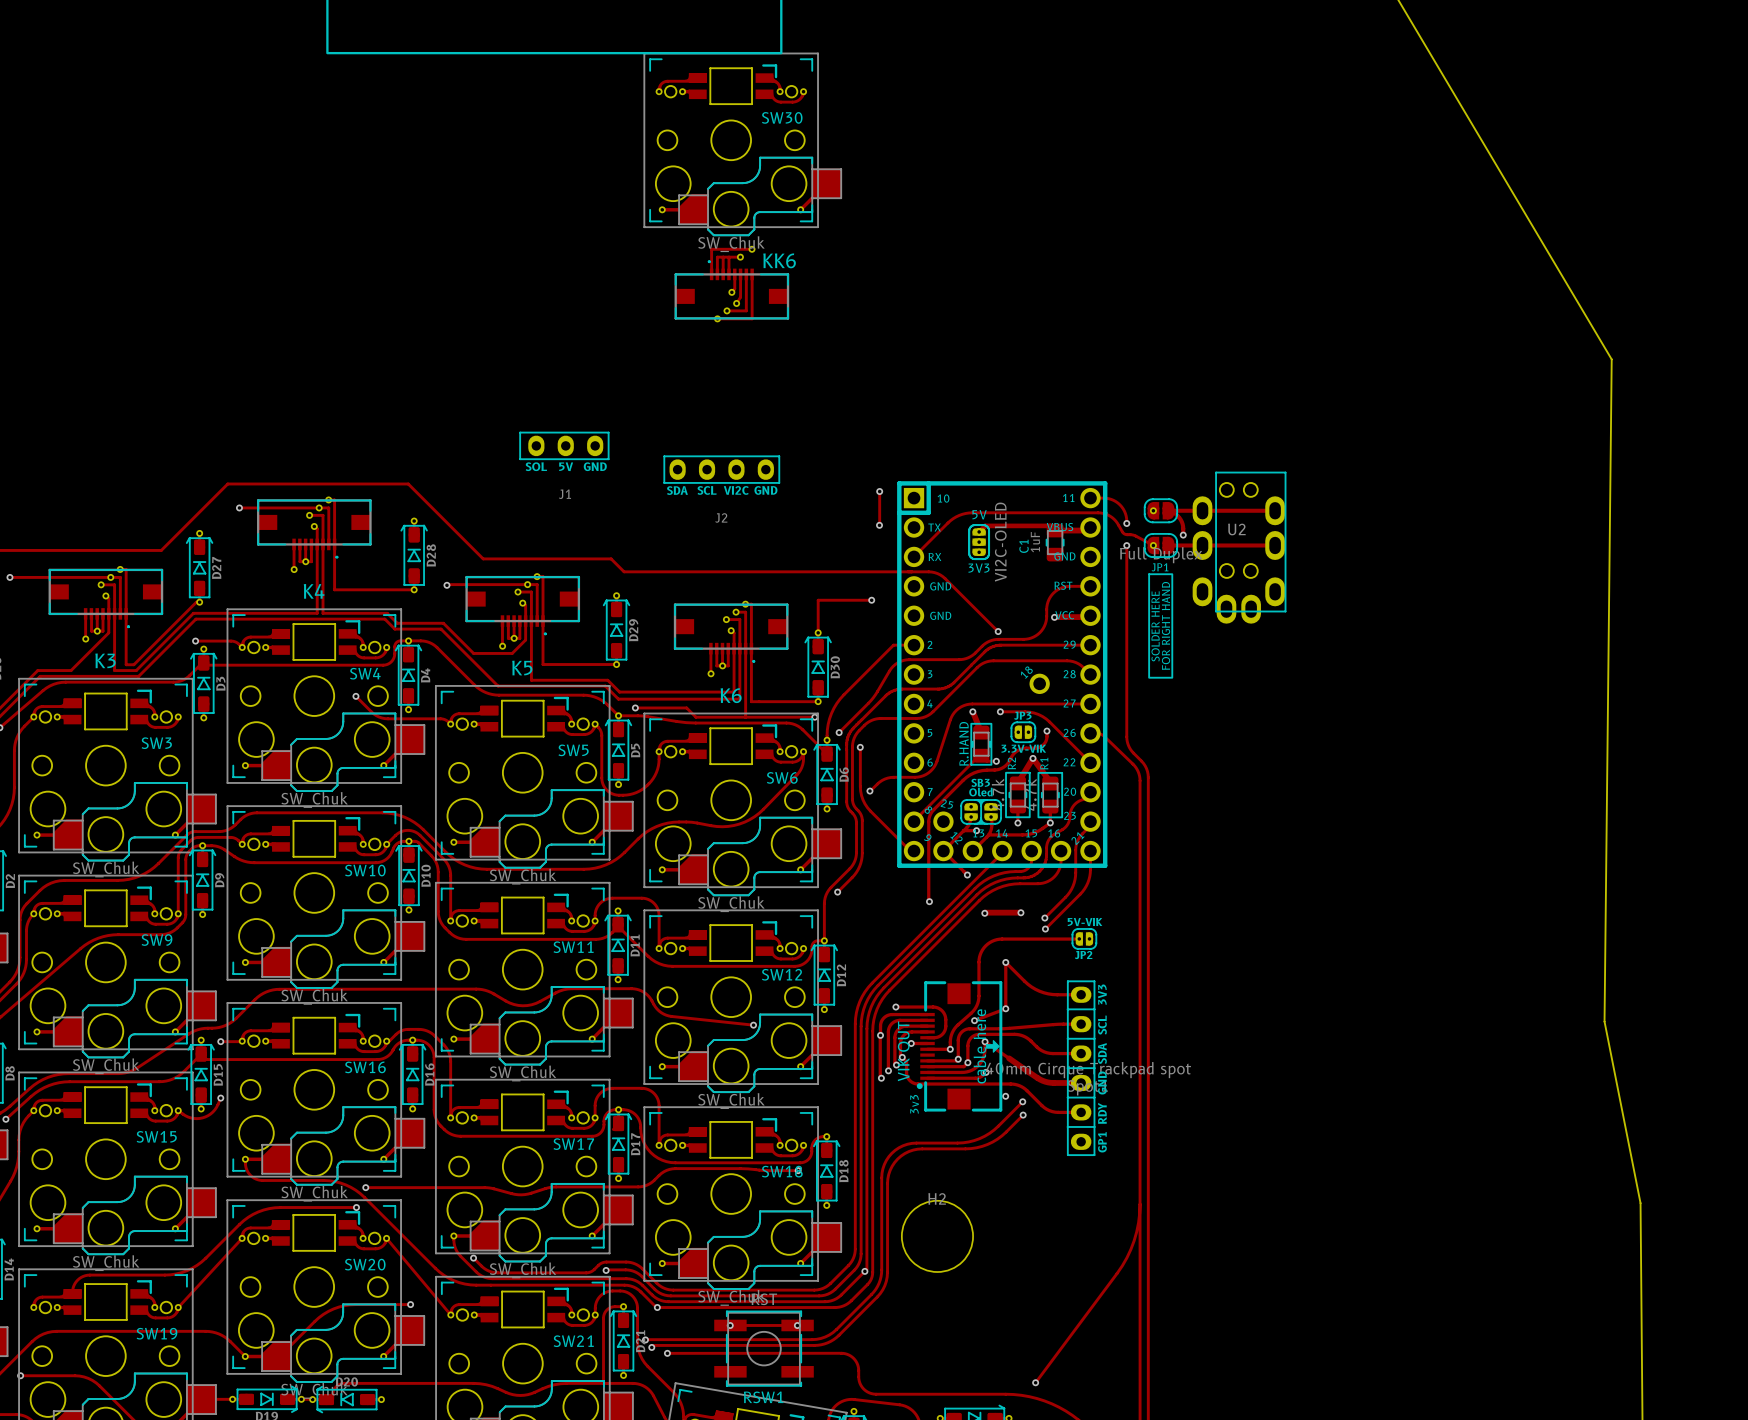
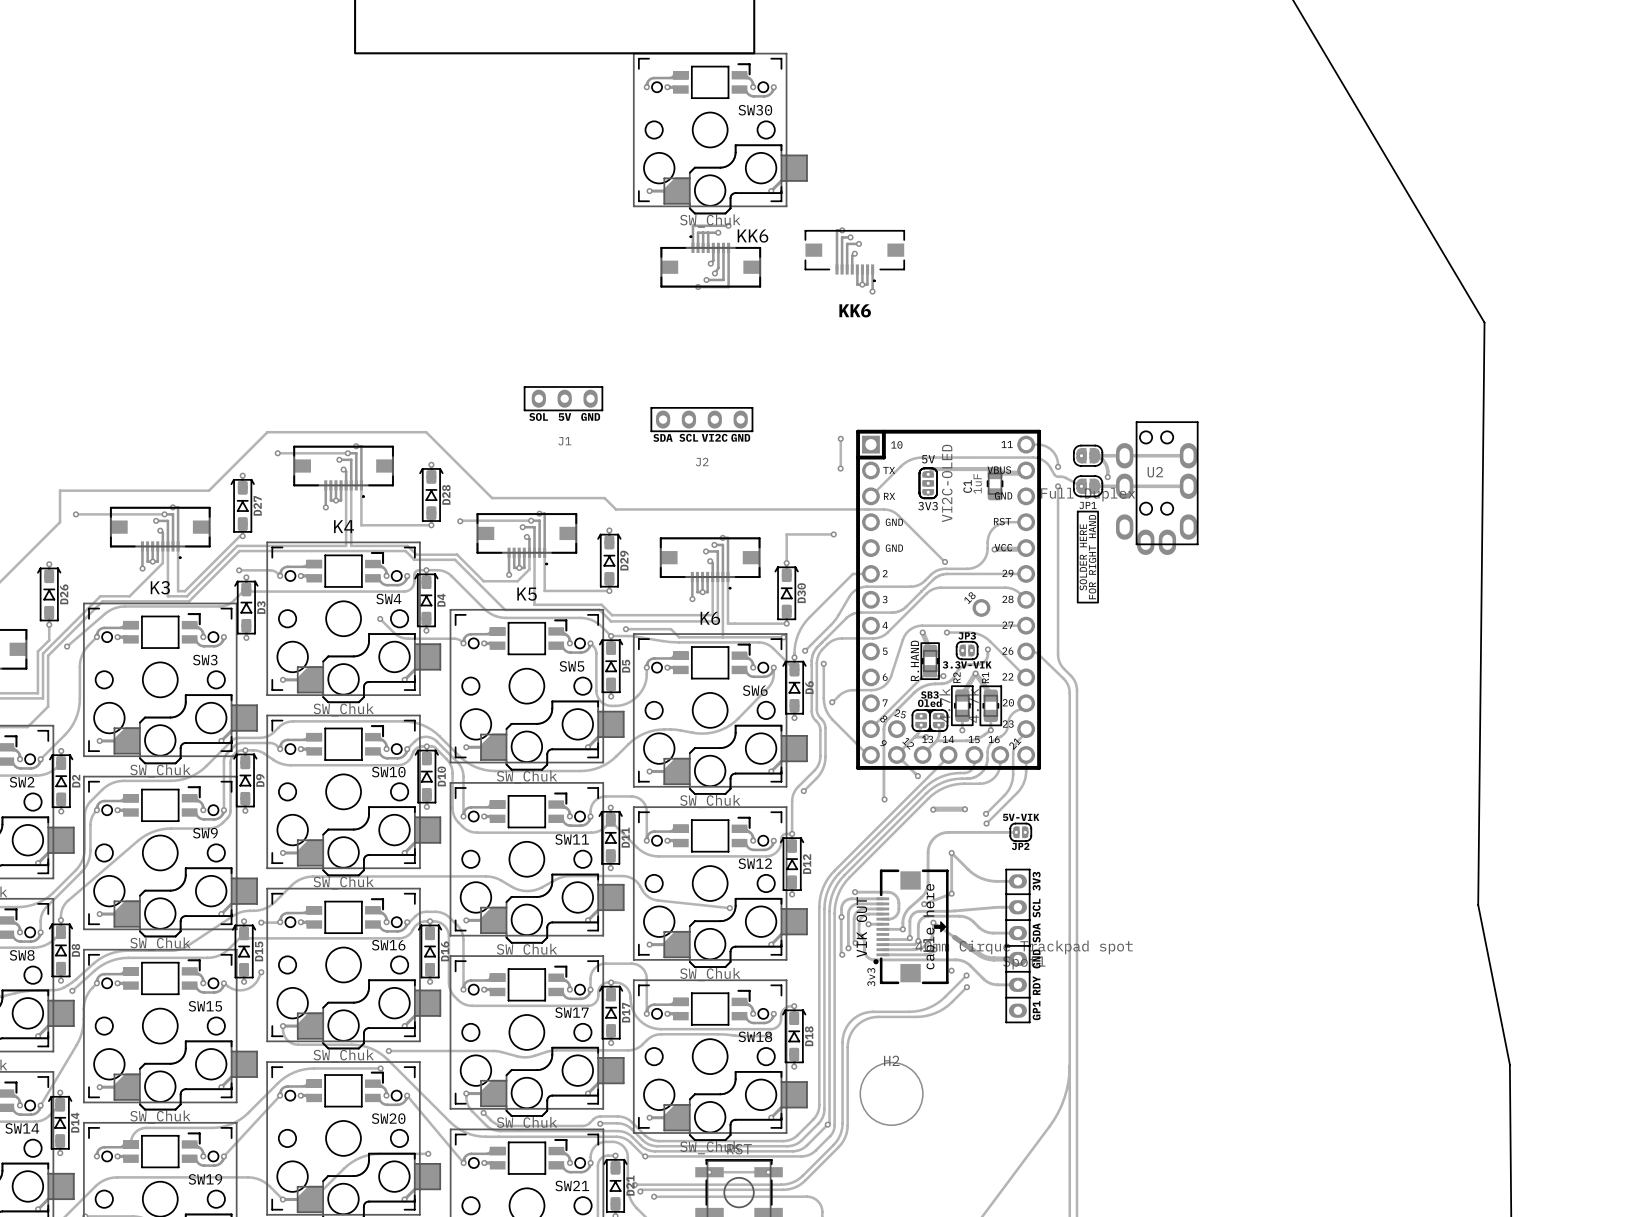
KK6: none -> (854, 260)

